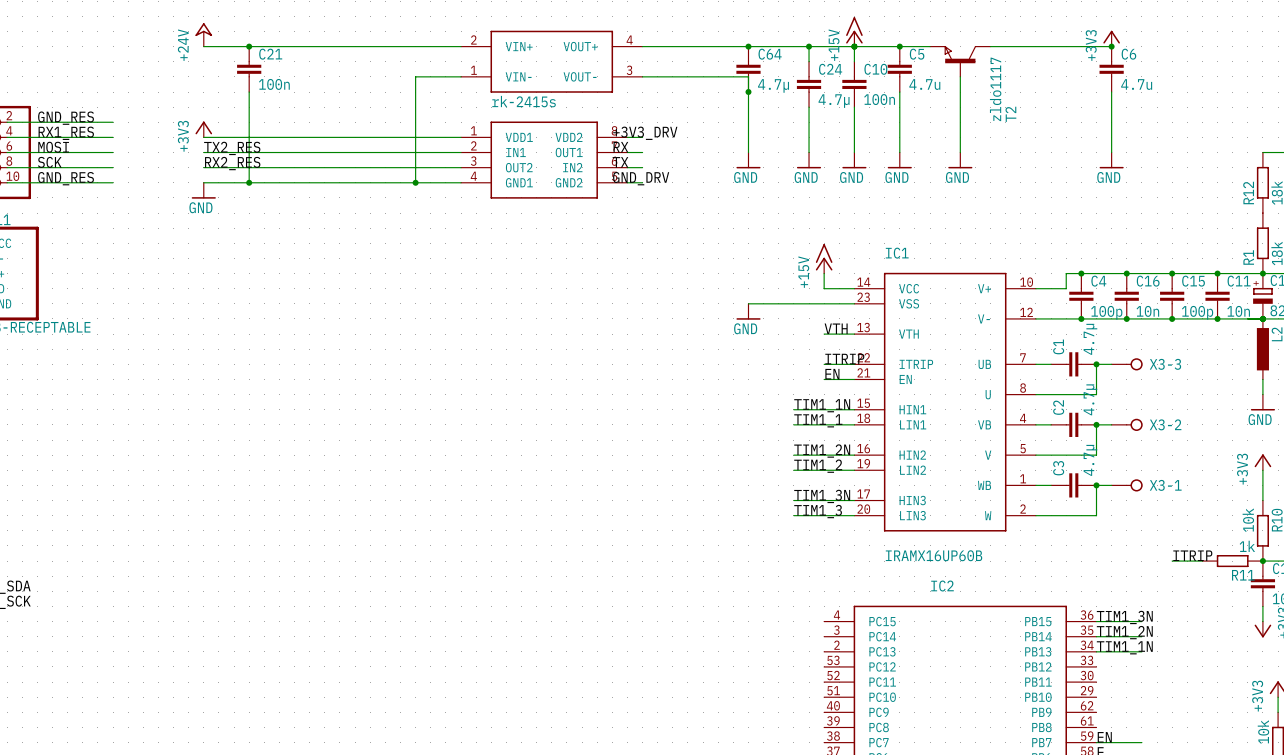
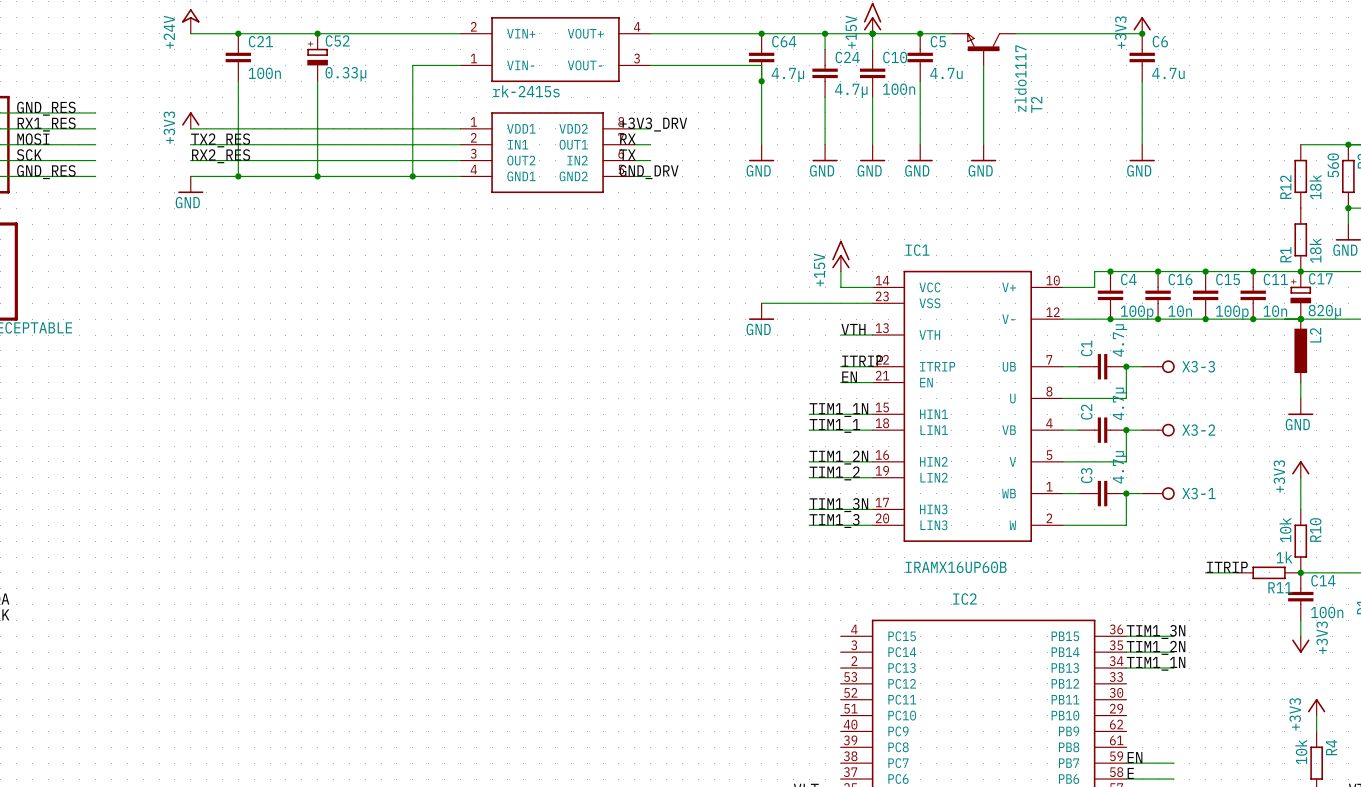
junction: none -> (317, 33)
C52: none -> 0.33µ (317, 57)
wire: none -> (317, 81) (317, 176)
junction: none -> (317, 176)

